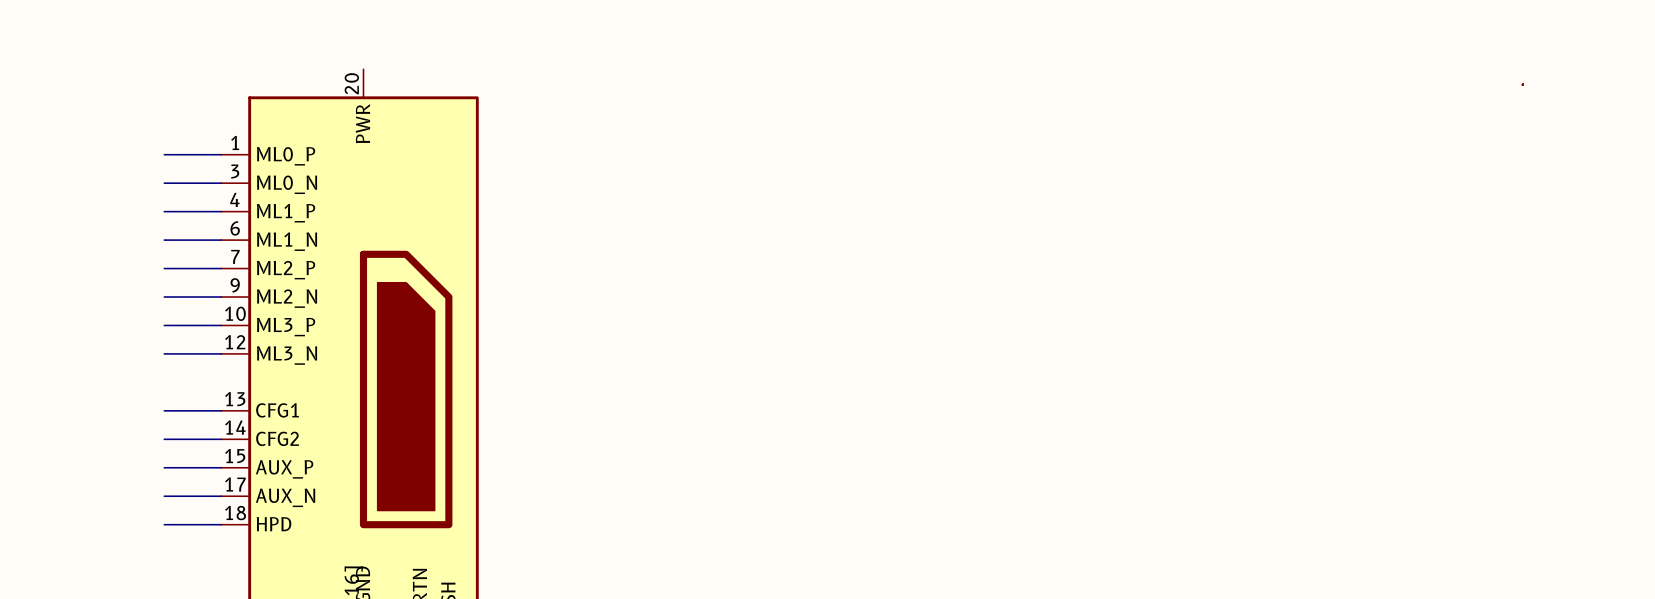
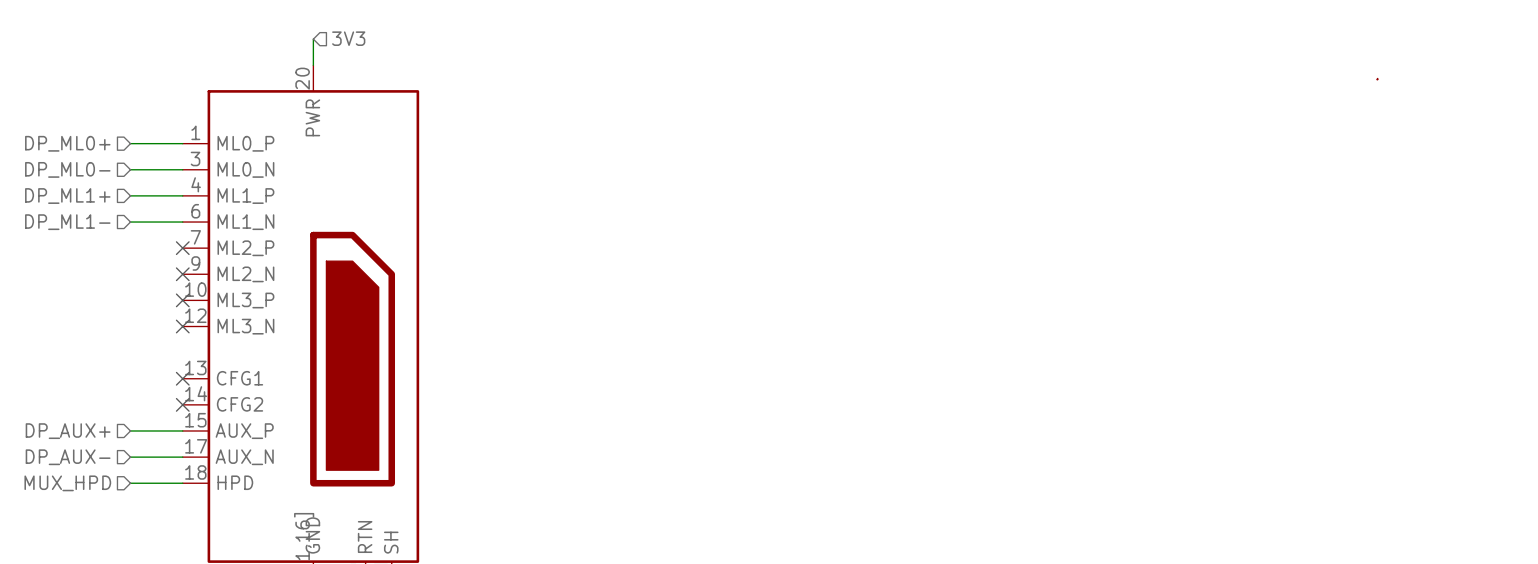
wire: none -> (313, 39) (313, 65)
hierarchical label: none -> 3V3 (348, 38)
hierarchical label: none -> DP_ML0+ (67, 143)
hierarchical label: none -> DP_ML0- (67, 169)
hierarchical label: none -> DP_ML1+ (67, 196)
hierarchical label: none -> DP_ML1- (67, 222)
wire: (164, 268) (221, 268) -> none
no-connect mark: none -> (182, 248)
wire: (164, 297) (221, 297) -> none
no-connect mark: none -> (182, 274)
wire: (164, 325) (221, 325) -> none
no-connect mark: none -> (182, 300)
wire: (164, 353) (221, 353) -> none
no-connect mark: none -> (182, 326)
wire: (164, 410) (221, 410) -> none
no-connect mark: none -> (182, 378)
wire: (164, 439) (221, 439) -> none
no-connect mark: none -> (182, 404)
hierarchical label: none -> DP_AUX+ (68, 431)
hierarchical label: none -> DP_AUX- (68, 457)
hierarchical label: none -> MUX_HPD (67, 483)

